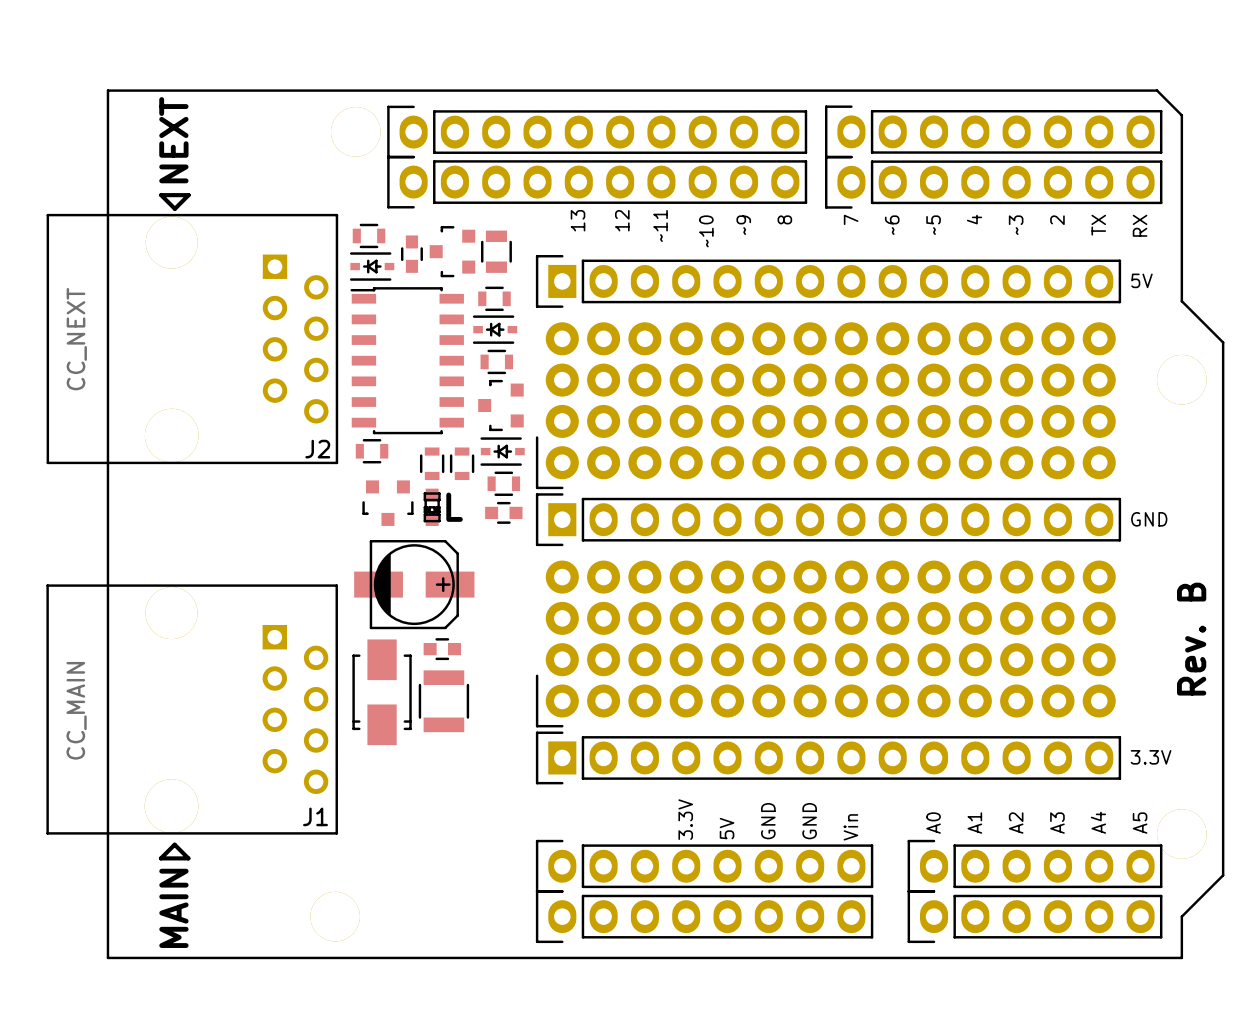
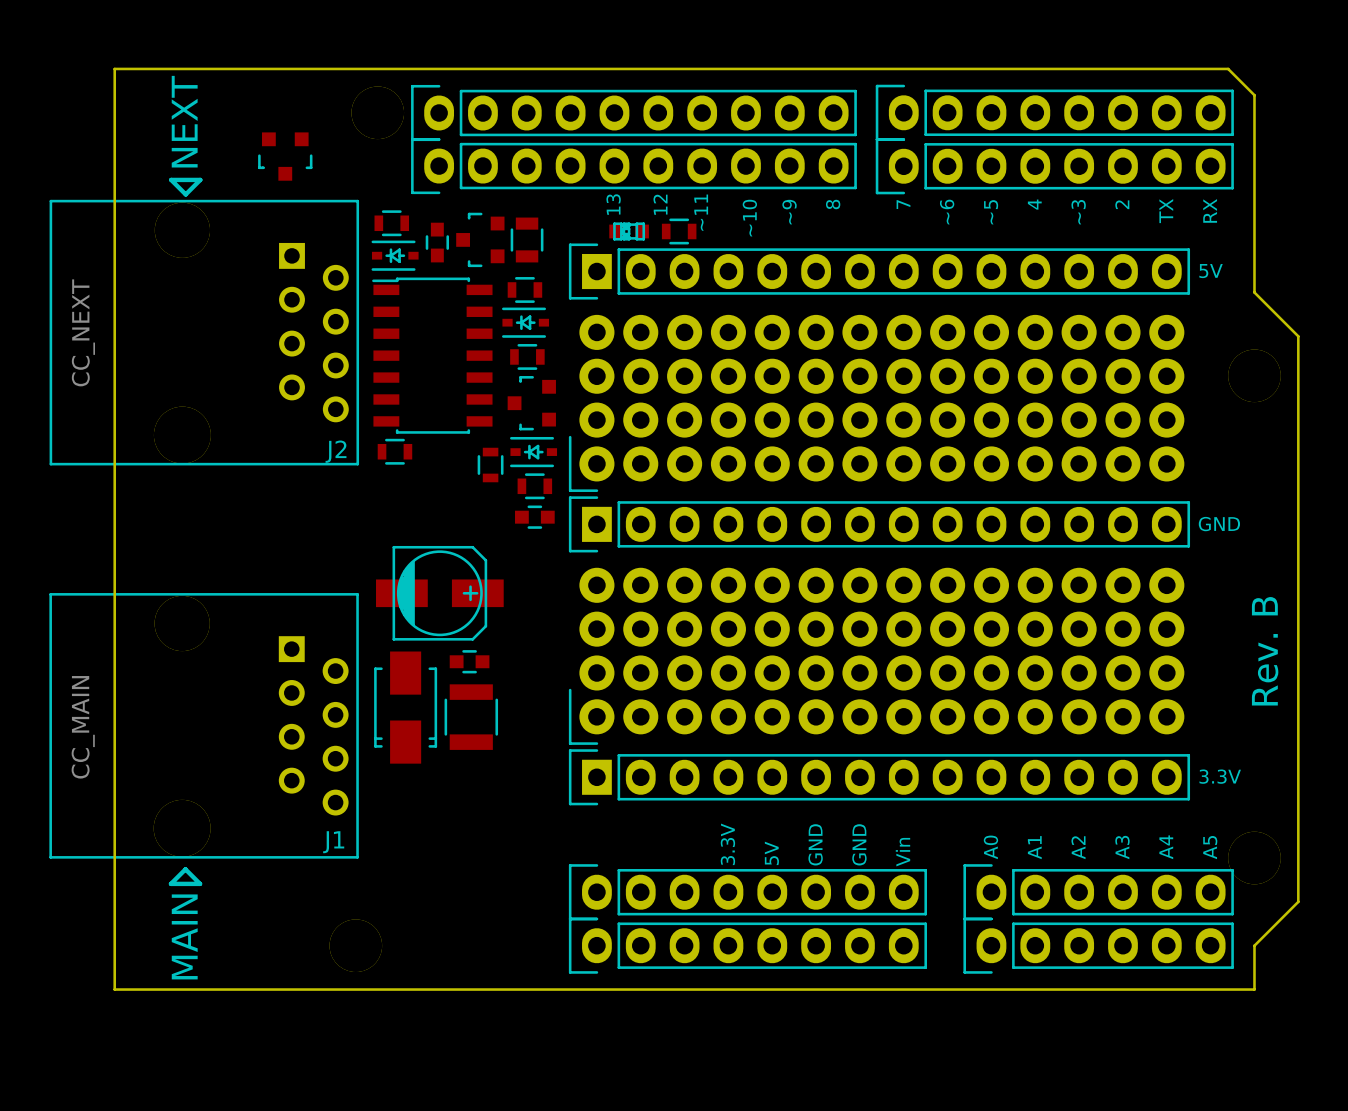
part rotation: 0° (432, 463) -> 90° clockwise (679, 231)
part position: (432, 463) -> (679, 231)
part position: (387, 503) -> (285, 156)
part rotation: 0° (432, 507) -> 90° clockwise (629, 231)
part position: (432, 507) -> (629, 231)
text: L (454, 507) -> none

